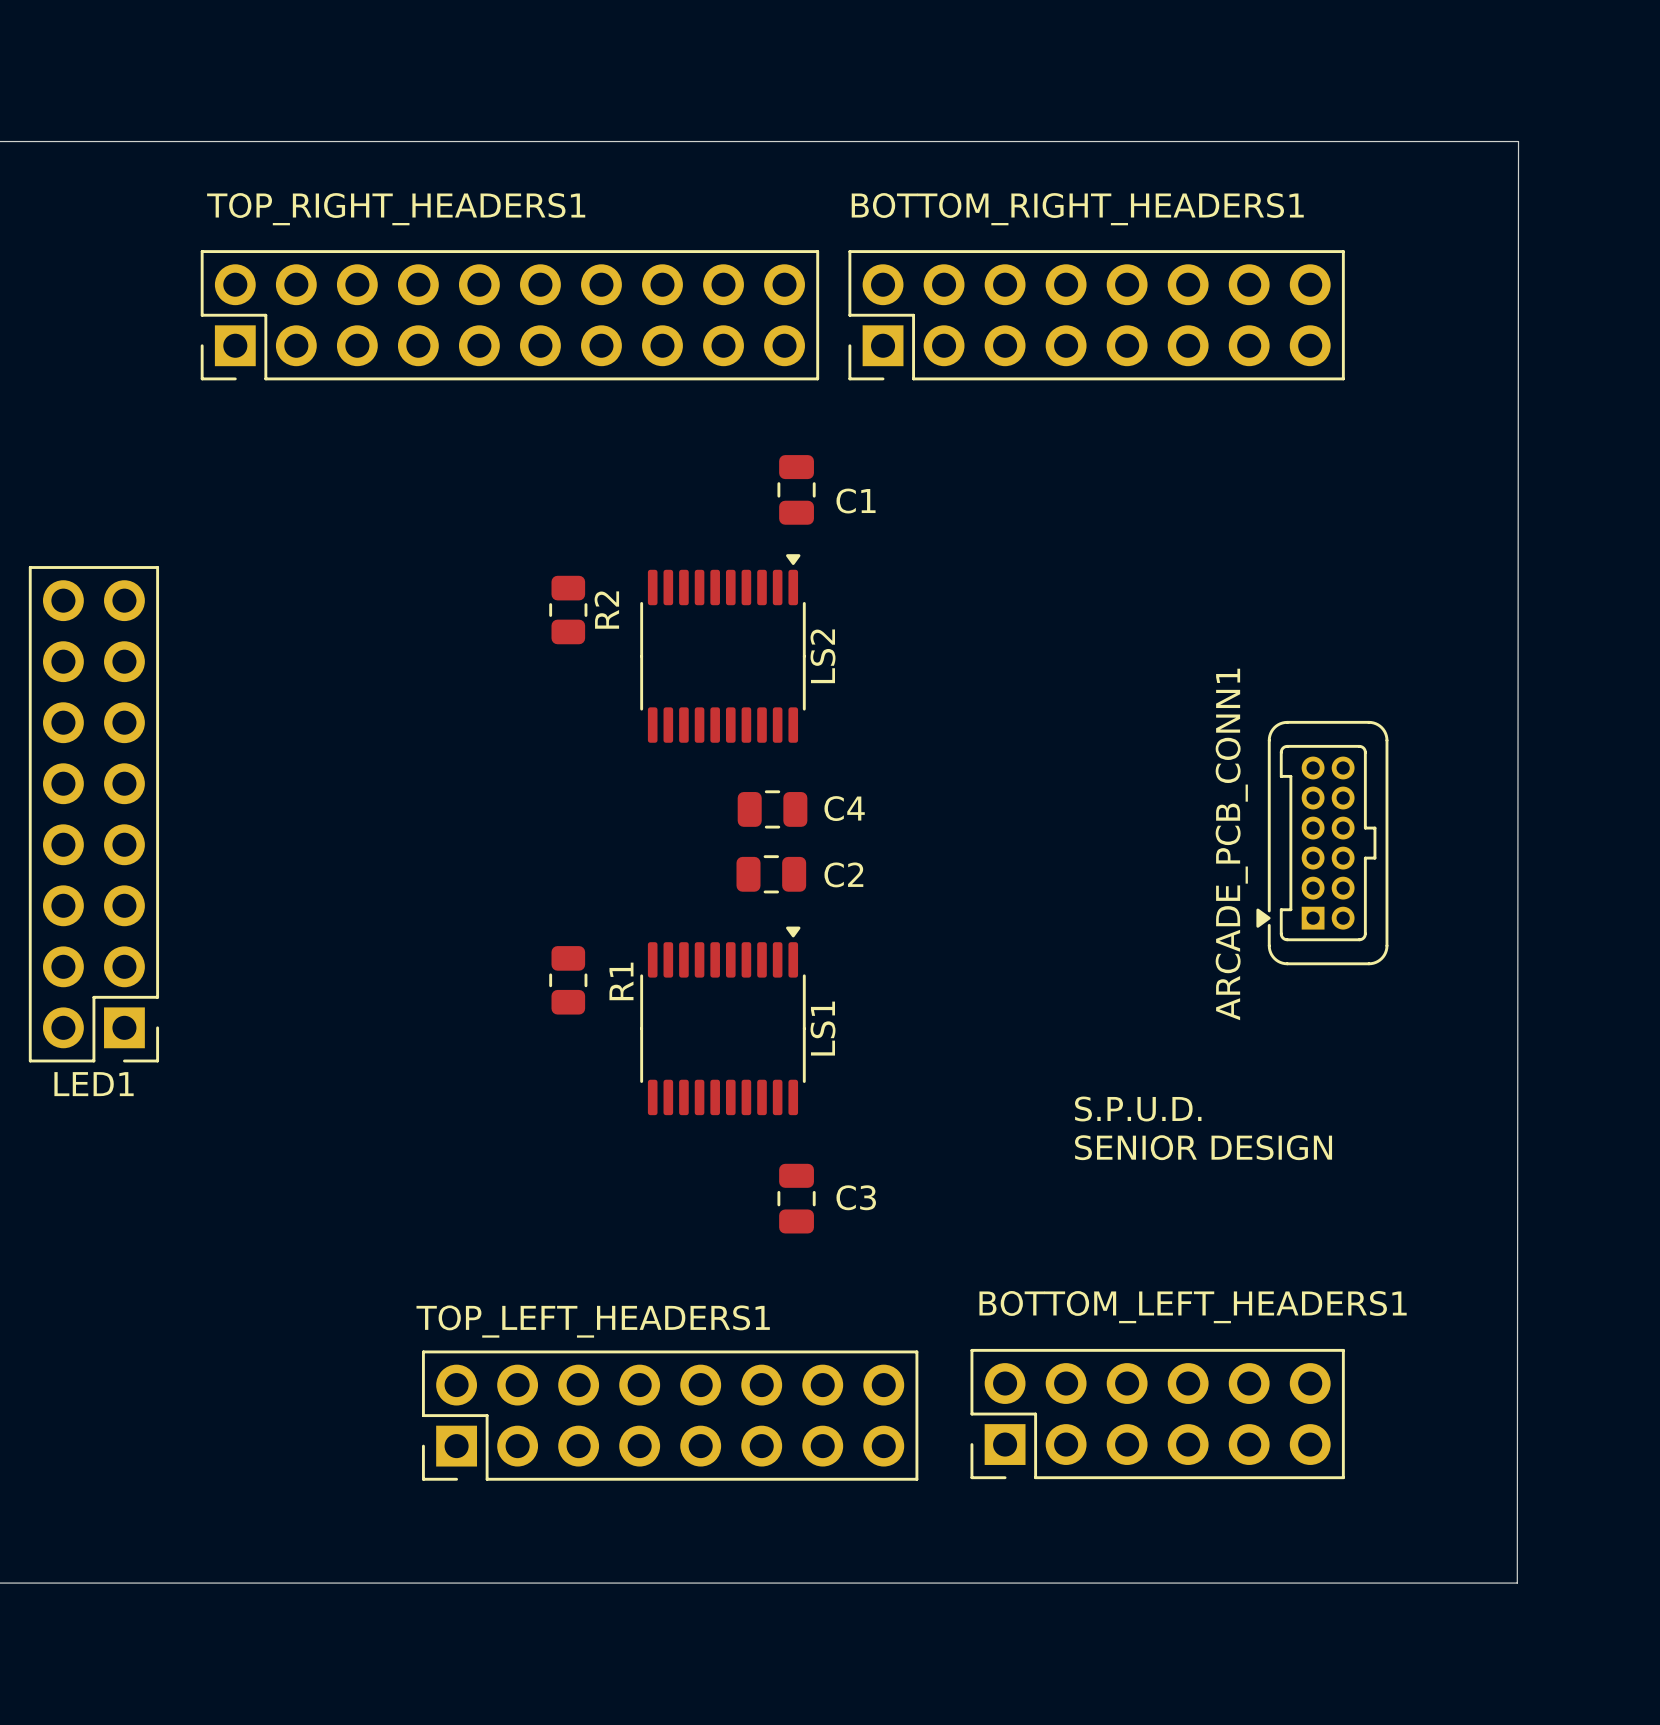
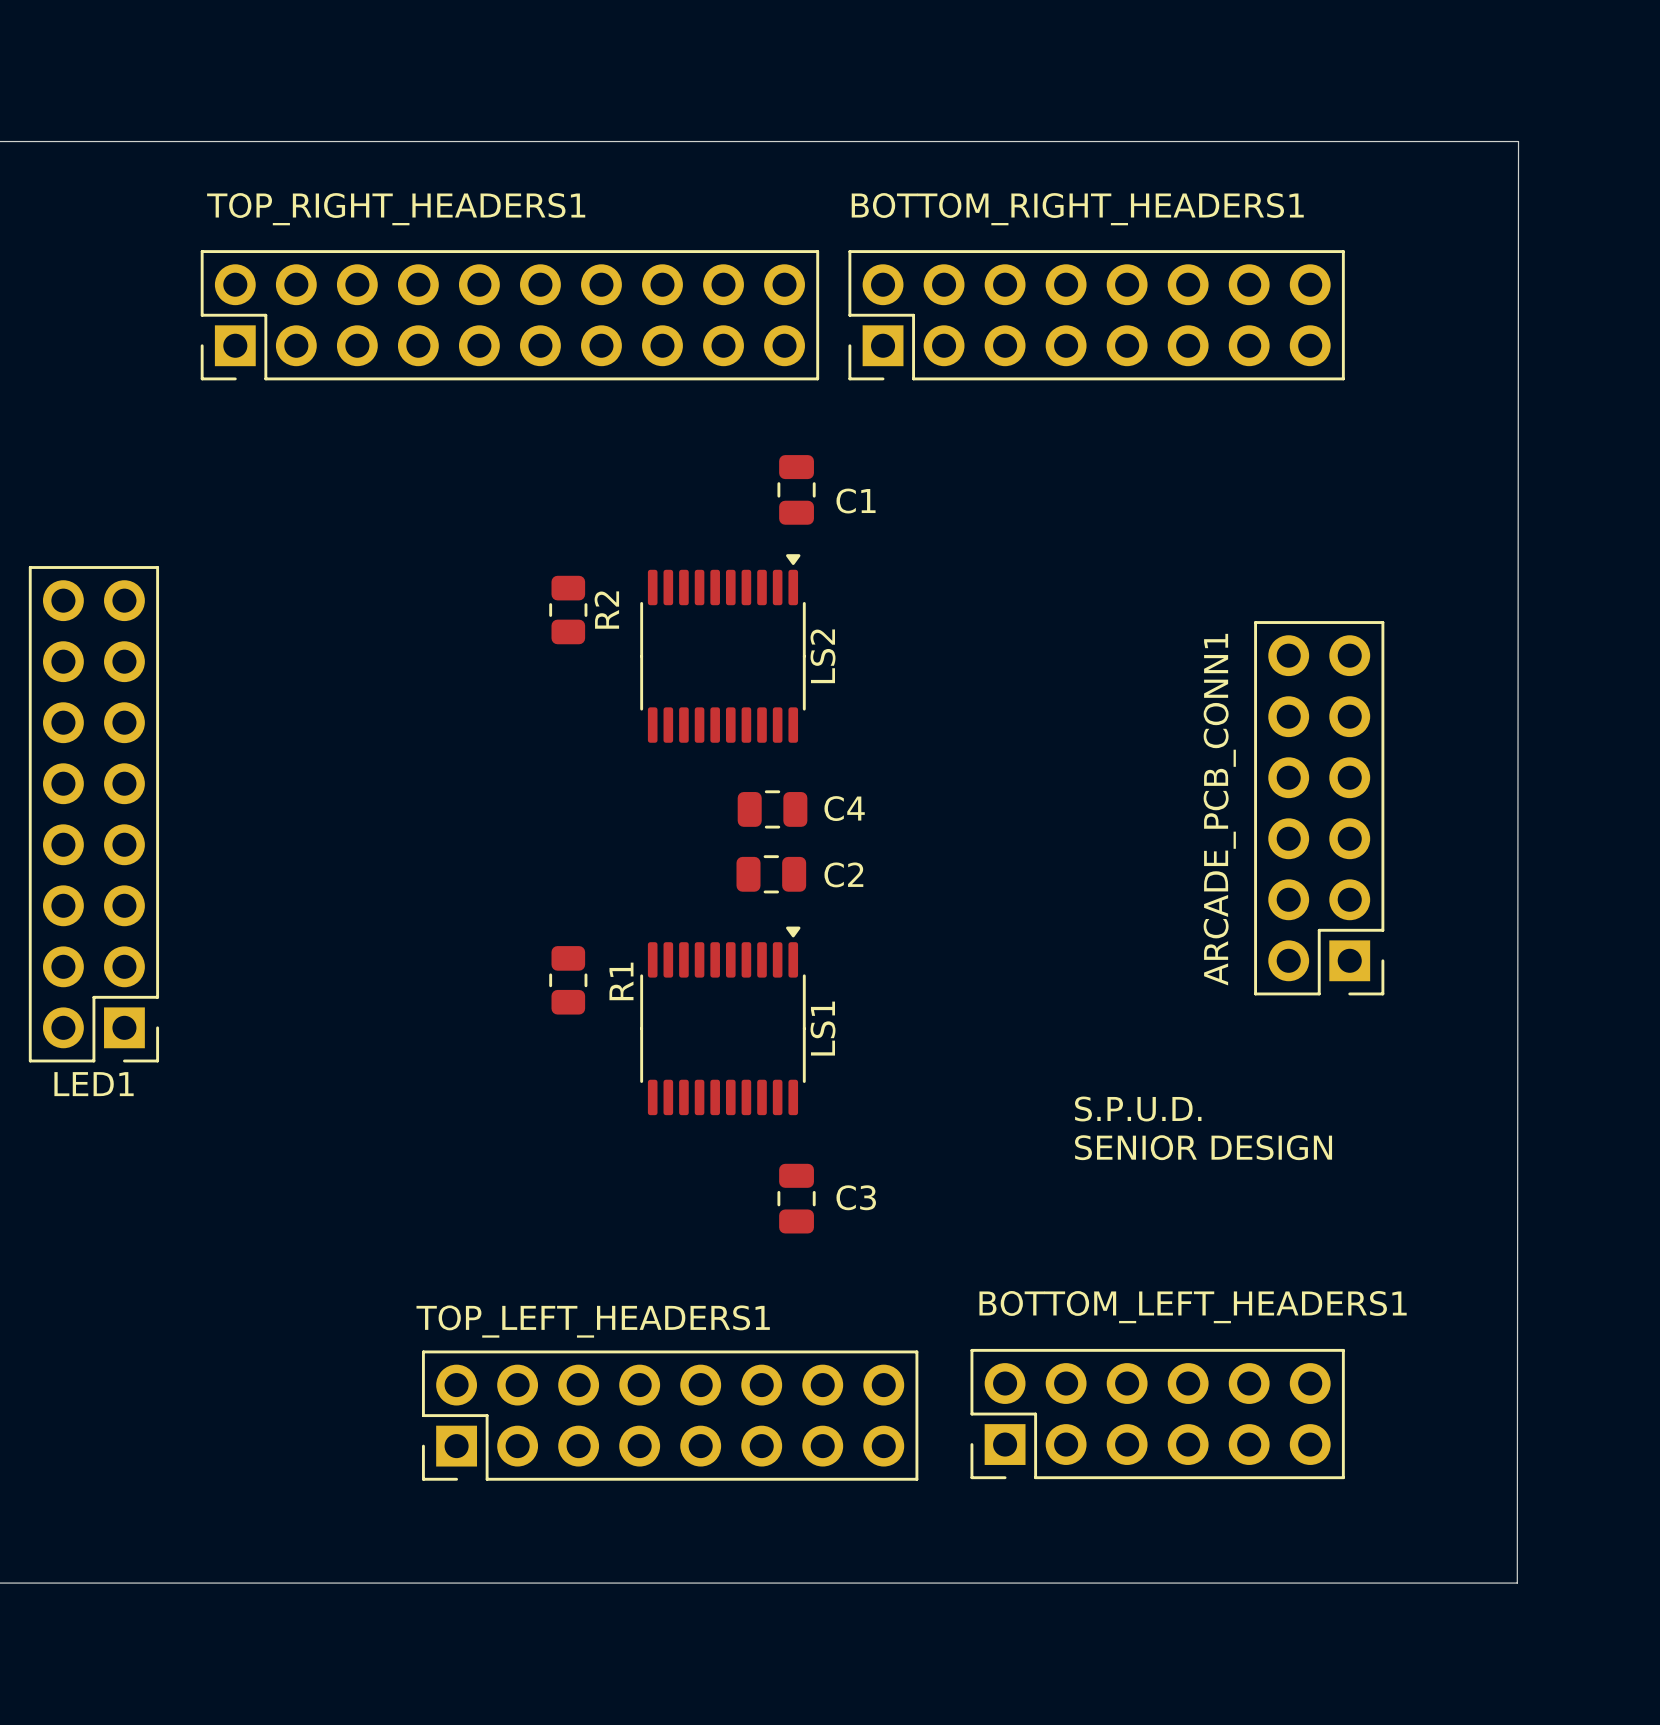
ARCADE_PCB_CONN1 footprint: [1256, 720, 1389, 966] -> [1254, 621, 1385, 996]

